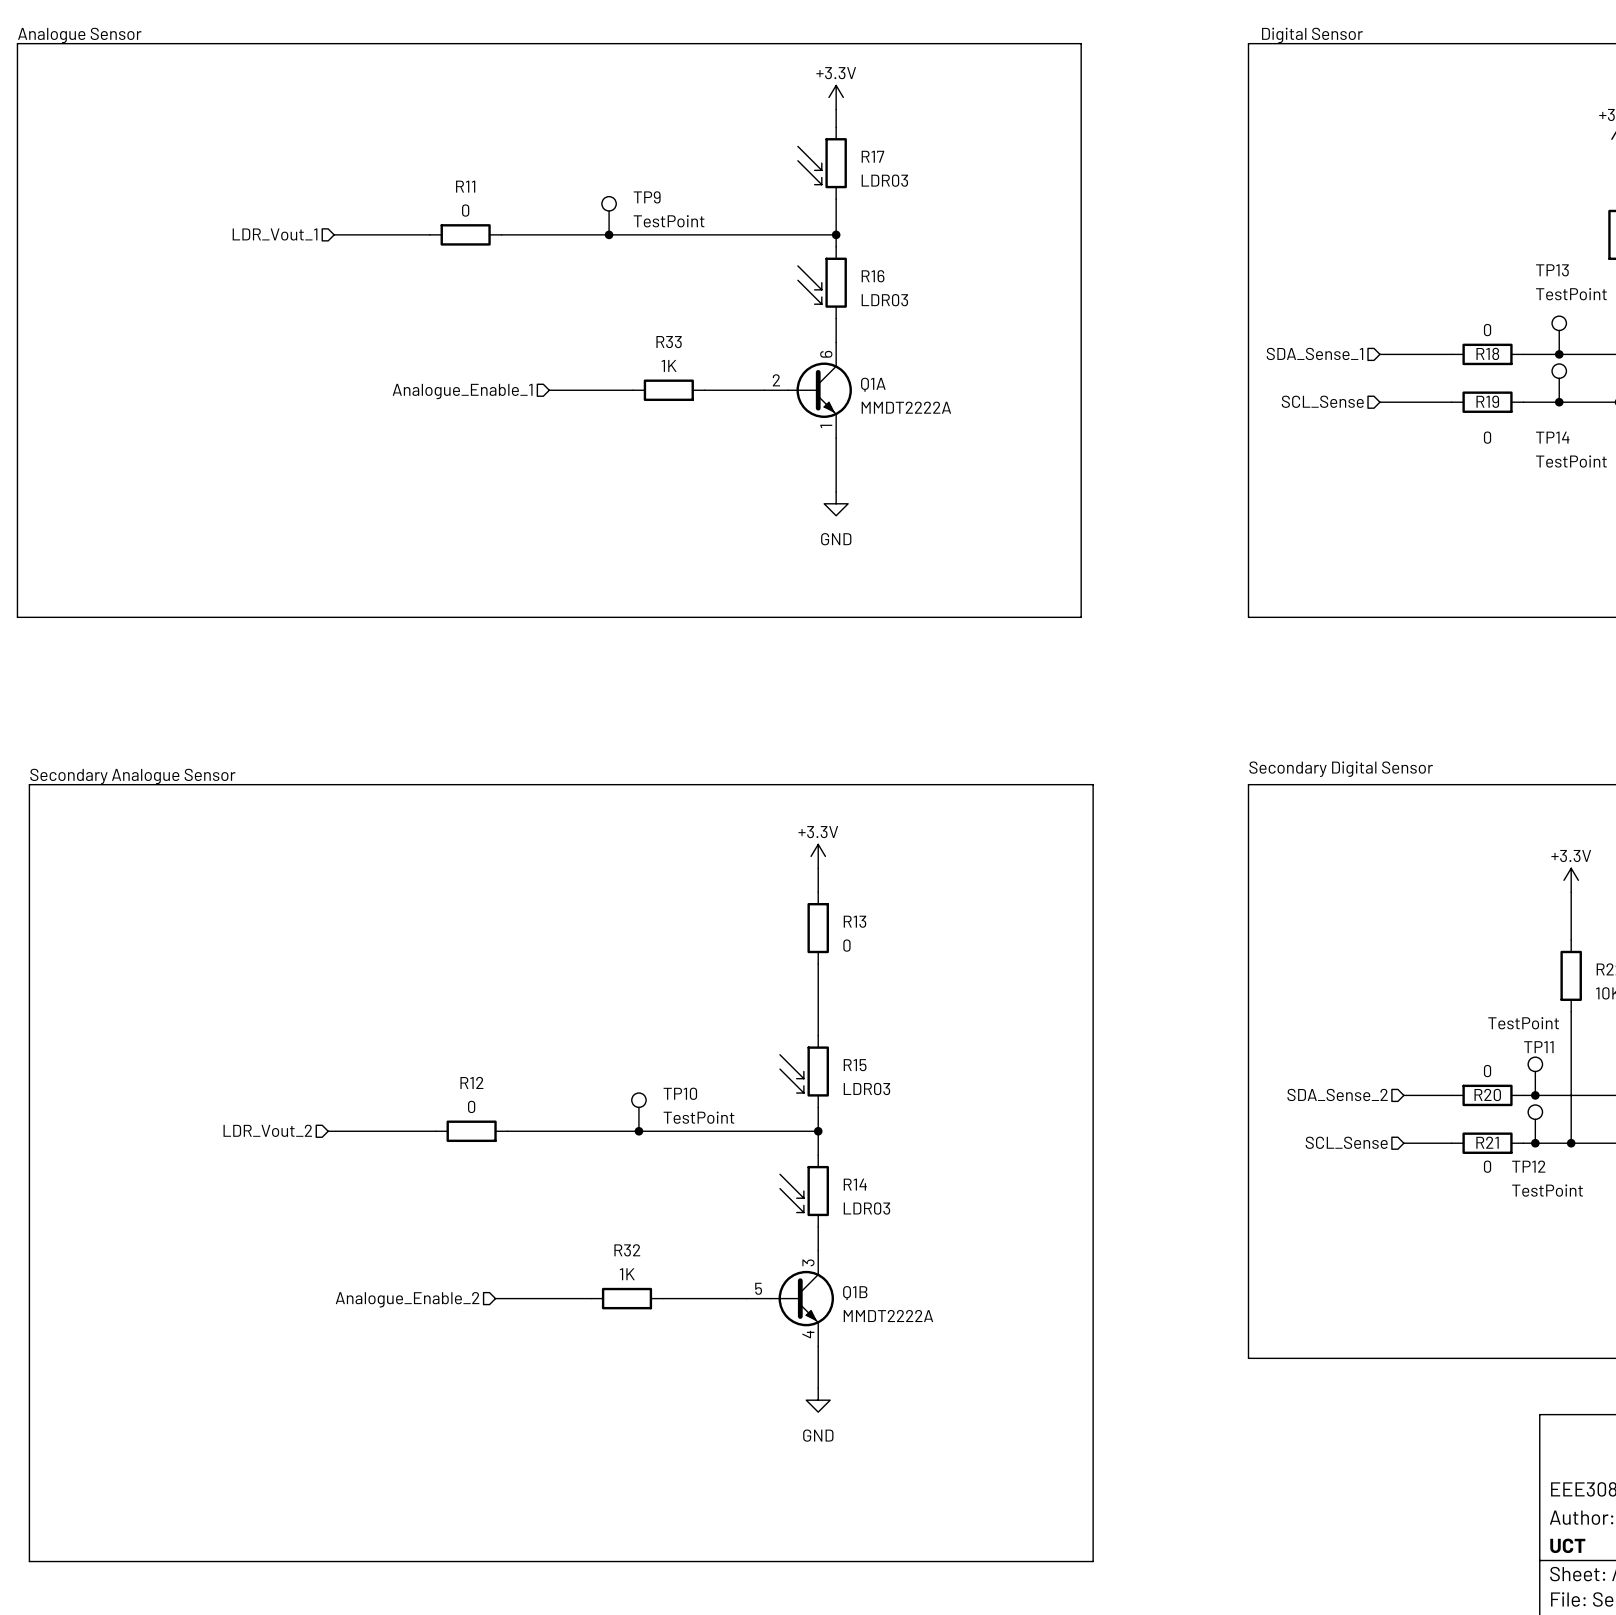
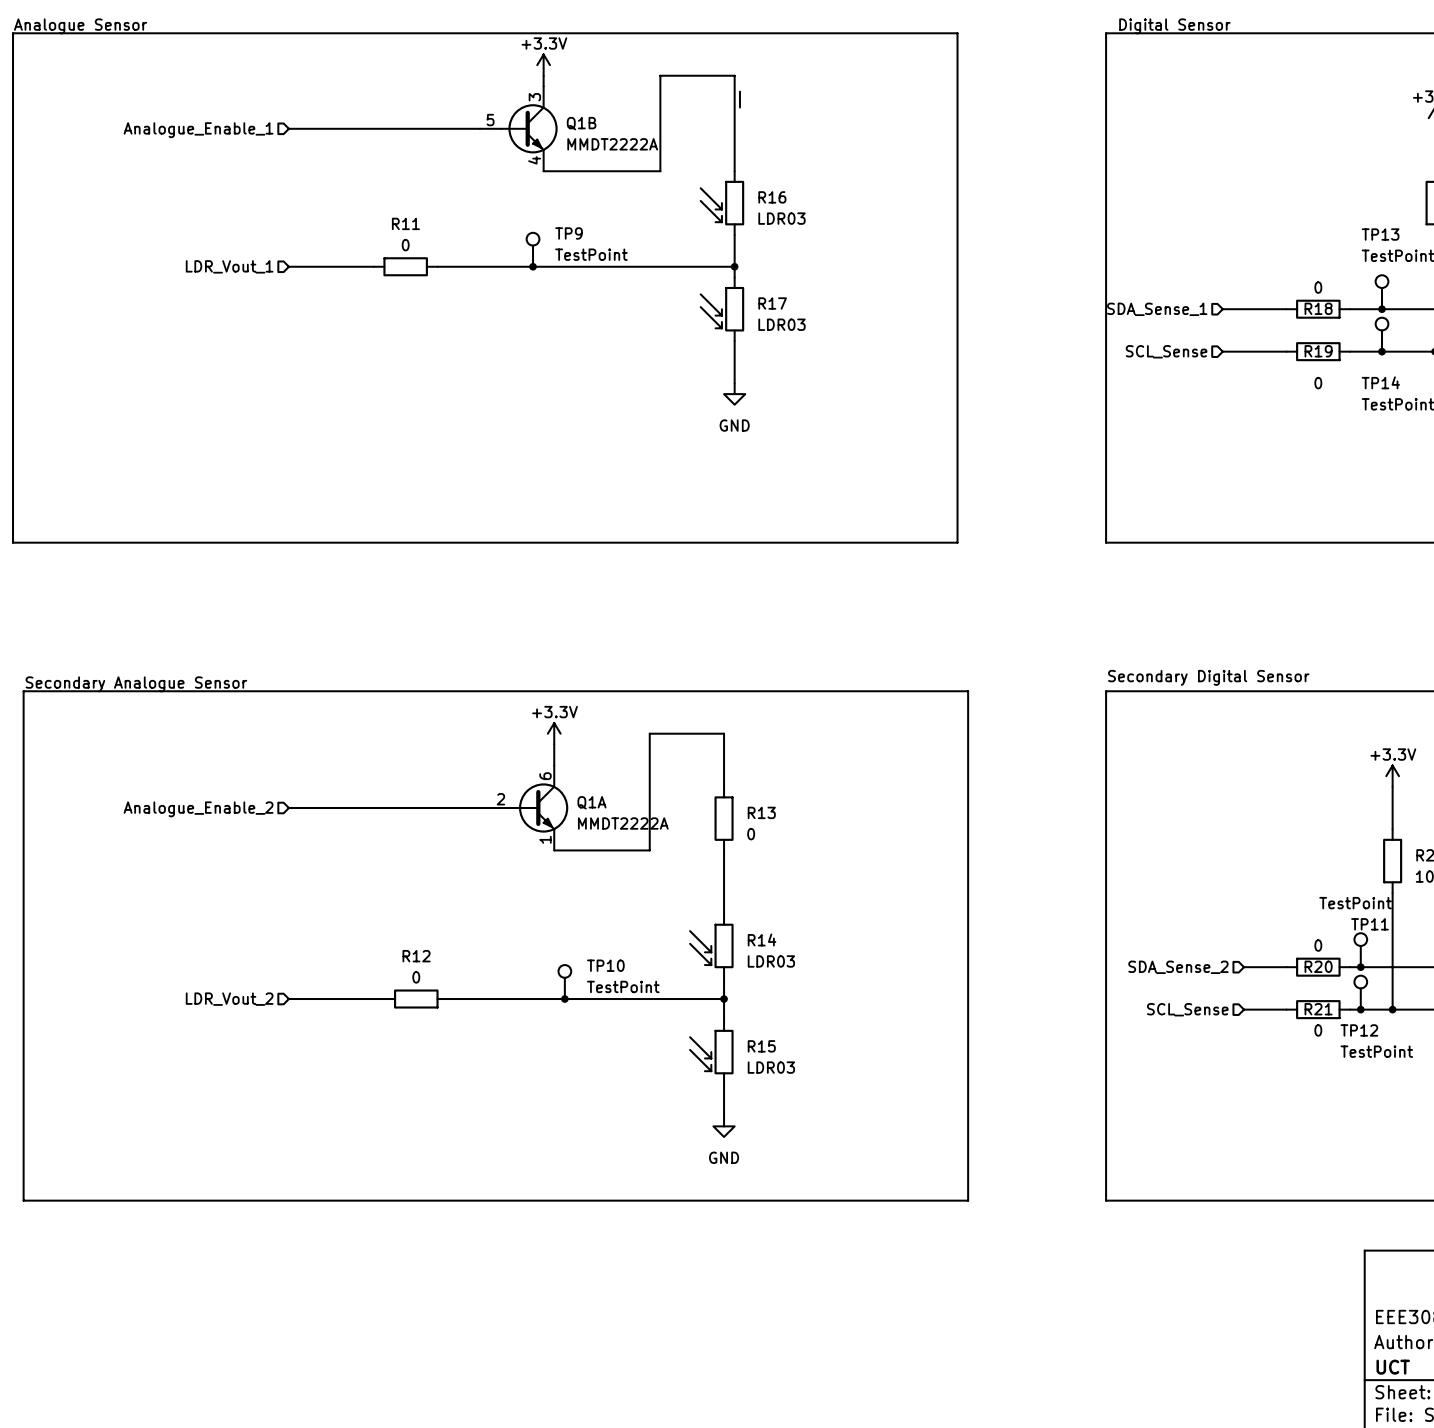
wire: none -> (543, 75) (543, 86)
power symbol position: +3.3V (836, 97) -> +3.3V (543, 65)
wire: none -> (288, 128) (479, 128)
hierarchical label: none -> Analogue_Enable_1 (198, 130)
R17 position: (822, 163) -> (722, 309)
wire: none -> (543, 171) (660, 171) (660, 75) (734, 75) (734, 171)
wire: (836, 199) (836, 246) -> (734, 234) (734, 277)
TP9 position: (609, 215) -> (533, 249)
hierarchical label position: LDR_Vout_1 (275, 234) -> LDR_Vout_1 (229, 266)
wire: (334, 234) (429, 234) -> (288, 266) (373, 266)
R11 position: (465, 234) -> (405, 266)
wire: (501, 234) (836, 234) -> (437, 266) (734, 266)
junction: (609, 234) -> none
junction: (836, 234) -> none
R16 position: (822, 282) -> (722, 203)
junction: none -> (533, 266)
junction: none -> (734, 266)
wire: (836, 318) (836, 342) -> none
wire: (549, 390) (632, 390) -> none
R33: 1K (668, 390) -> none
wire: (704, 390) (764, 390) -> none
Q1A position: (808, 390) -> (529, 807)
wire: none -> (734, 341) (734, 383)
hierarchical label: Analogue_Enable_1 (462, 391) -> none
wire: (836, 438) (836, 491) -> none
power symbol position: GND (836, 503) -> GND (734, 394)
wire: none -> (554, 744) (554, 765)
power symbol position: +3.3V (818, 856) -> +3.3V (554, 733)
wire: none -> (724, 765) (724, 733) (649, 733) (649, 850) (554, 850)
wire: none -> (288, 807) (490, 807)
hierarchical label: none -> Analogue_Enable_2 (198, 809)
R15 name: R15 (855, 1065) -> R14 (762, 940)
R14 name: R14 (855, 1184) -> R15 (761, 1046)
wire: (495, 1298) (591, 1298) -> none
R32: 1K (627, 1298) -> none
wire: (662, 1298) (746, 1298) -> none
Q1B position: (790, 1298) -> (518, 128)
hierarchical label: Analogue_Enable_2 (407, 1299) -> none
wire: (818, 1346) (818, 1388) -> none
line: (29, 1358) (29, 1561) (1093, 1561) (1093, 1358) -> (23, 1200) (968, 1200)
power symbol position: GND (818, 1400) -> GND (724, 1126)

